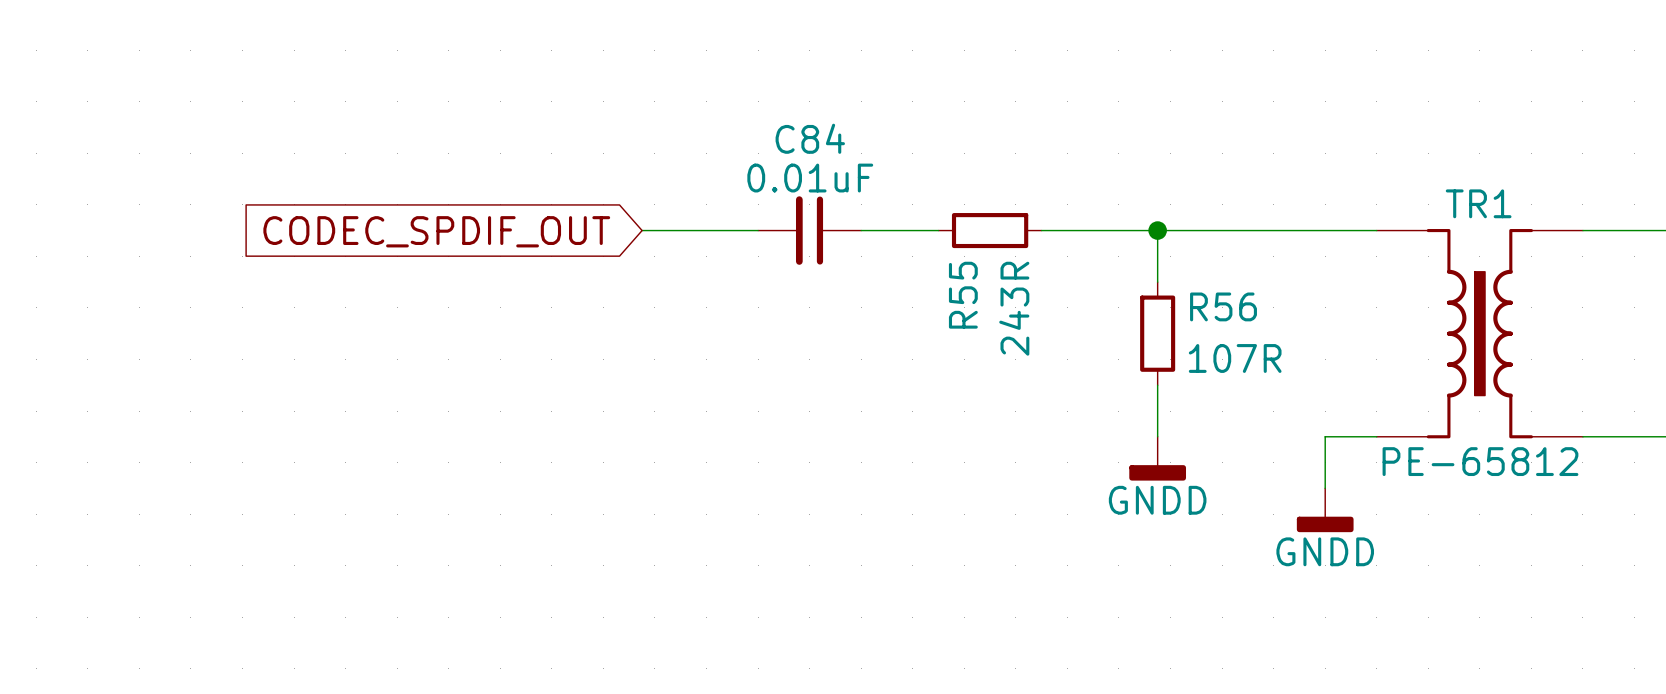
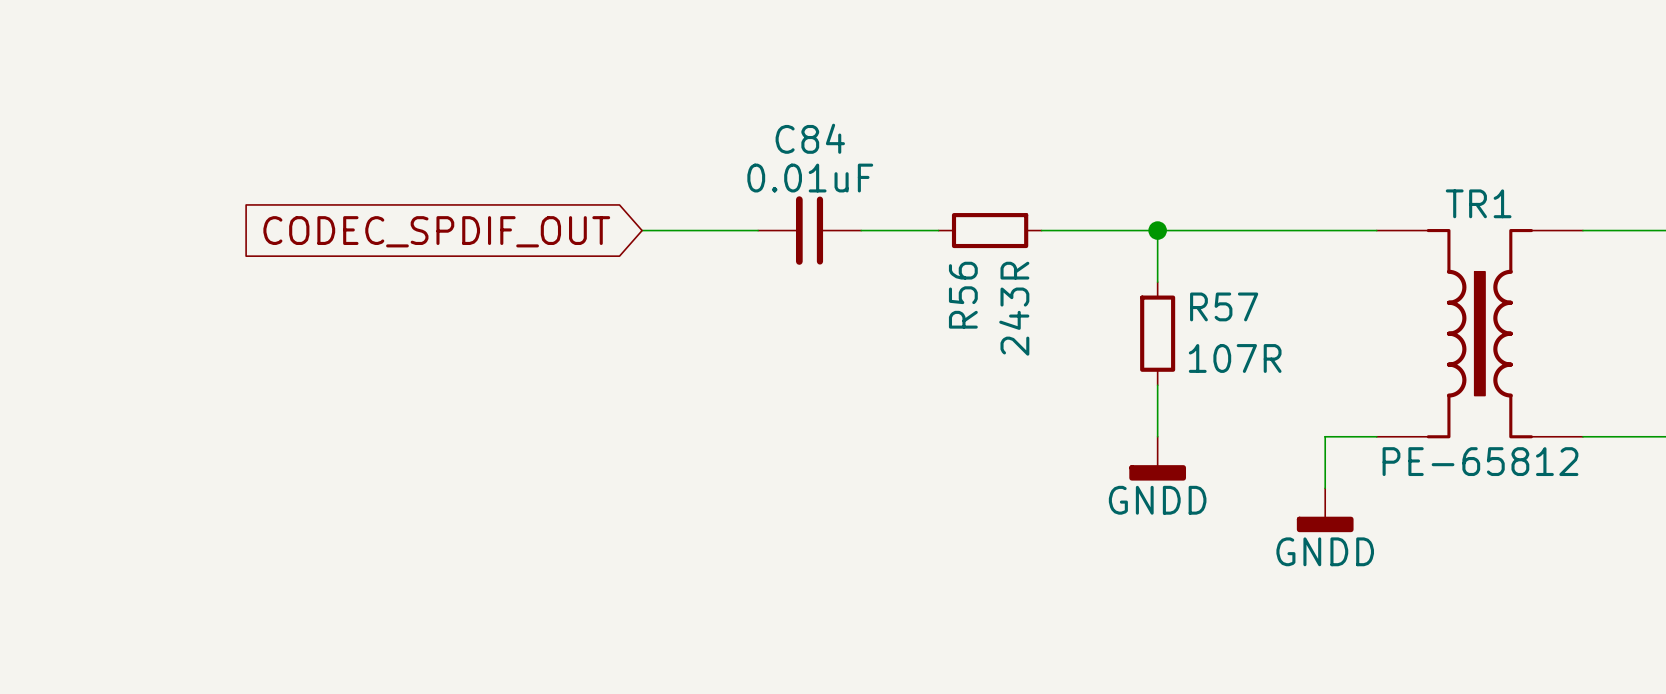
R55 name: R55 (963, 295) -> R56 (963, 295)
R56 name: R56 (1223, 306) -> R57 (1224, 306)

